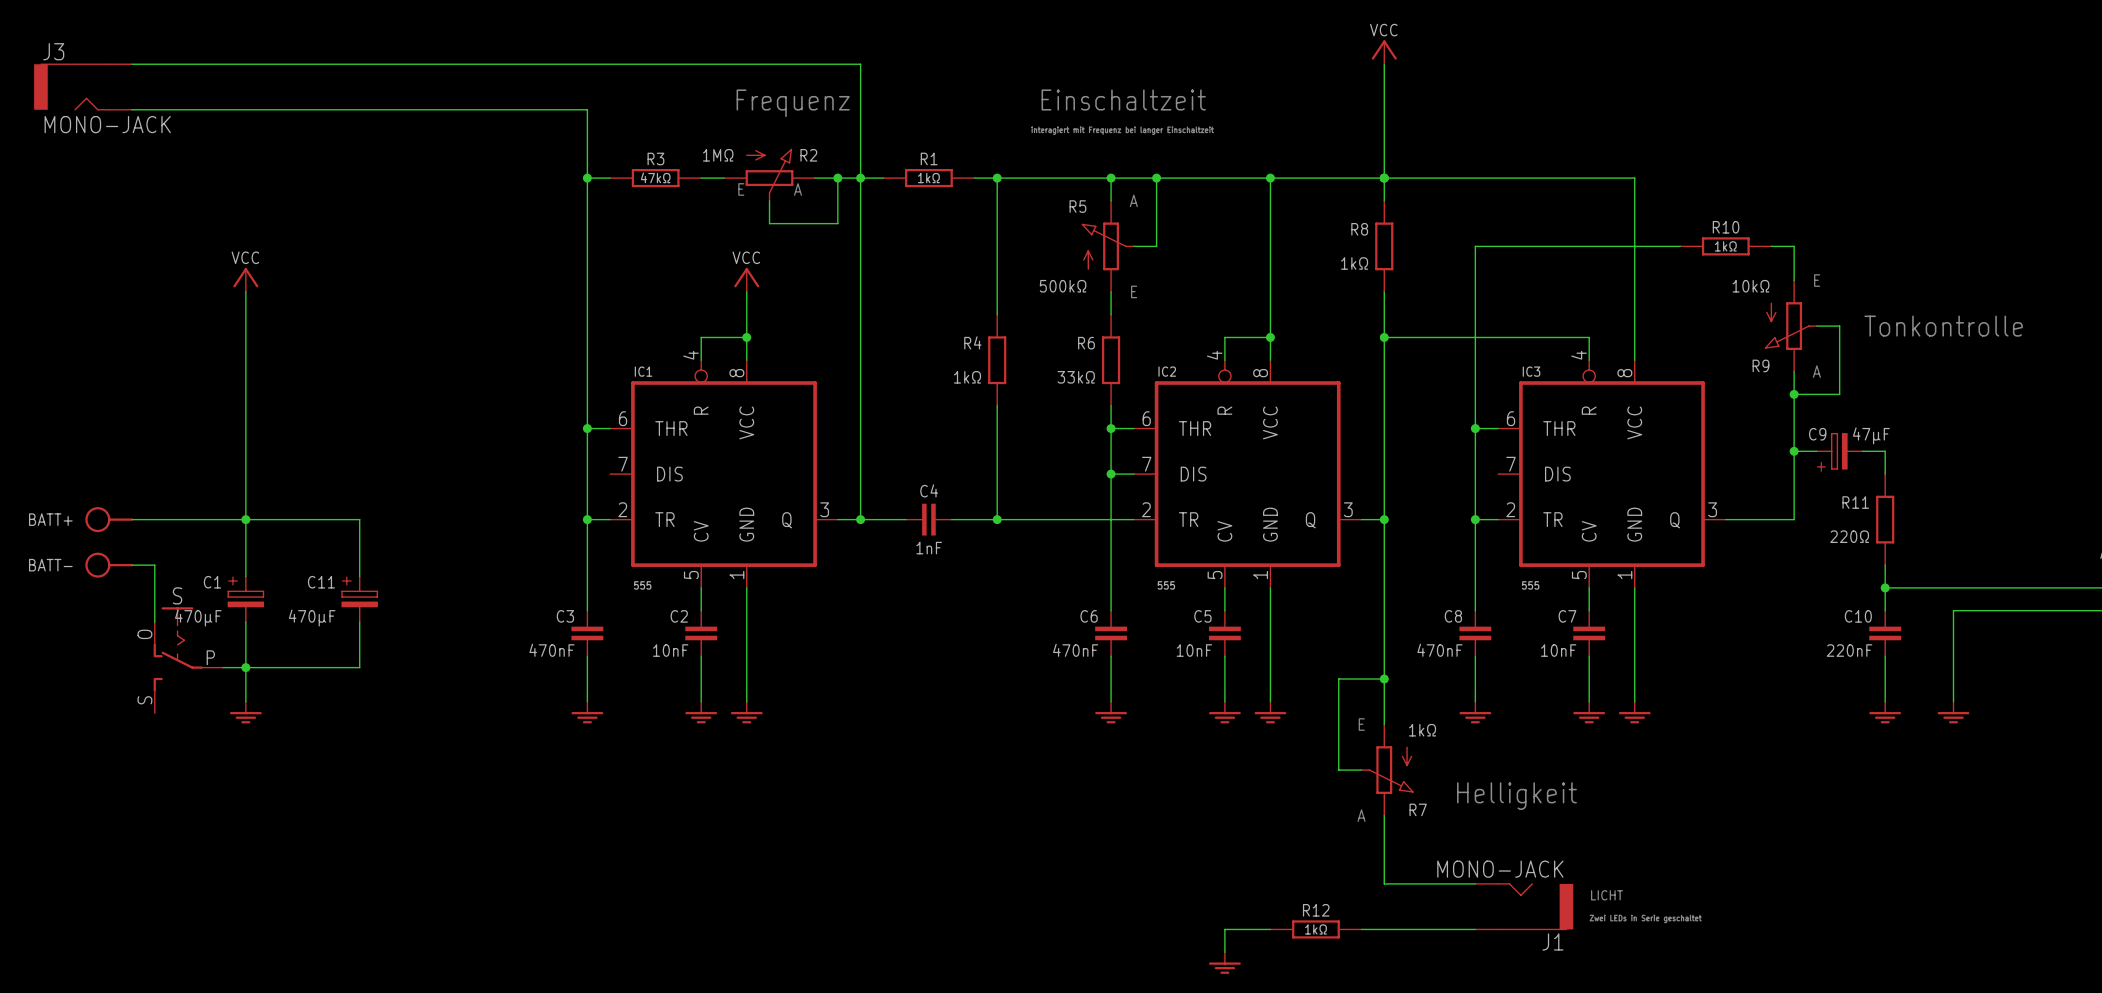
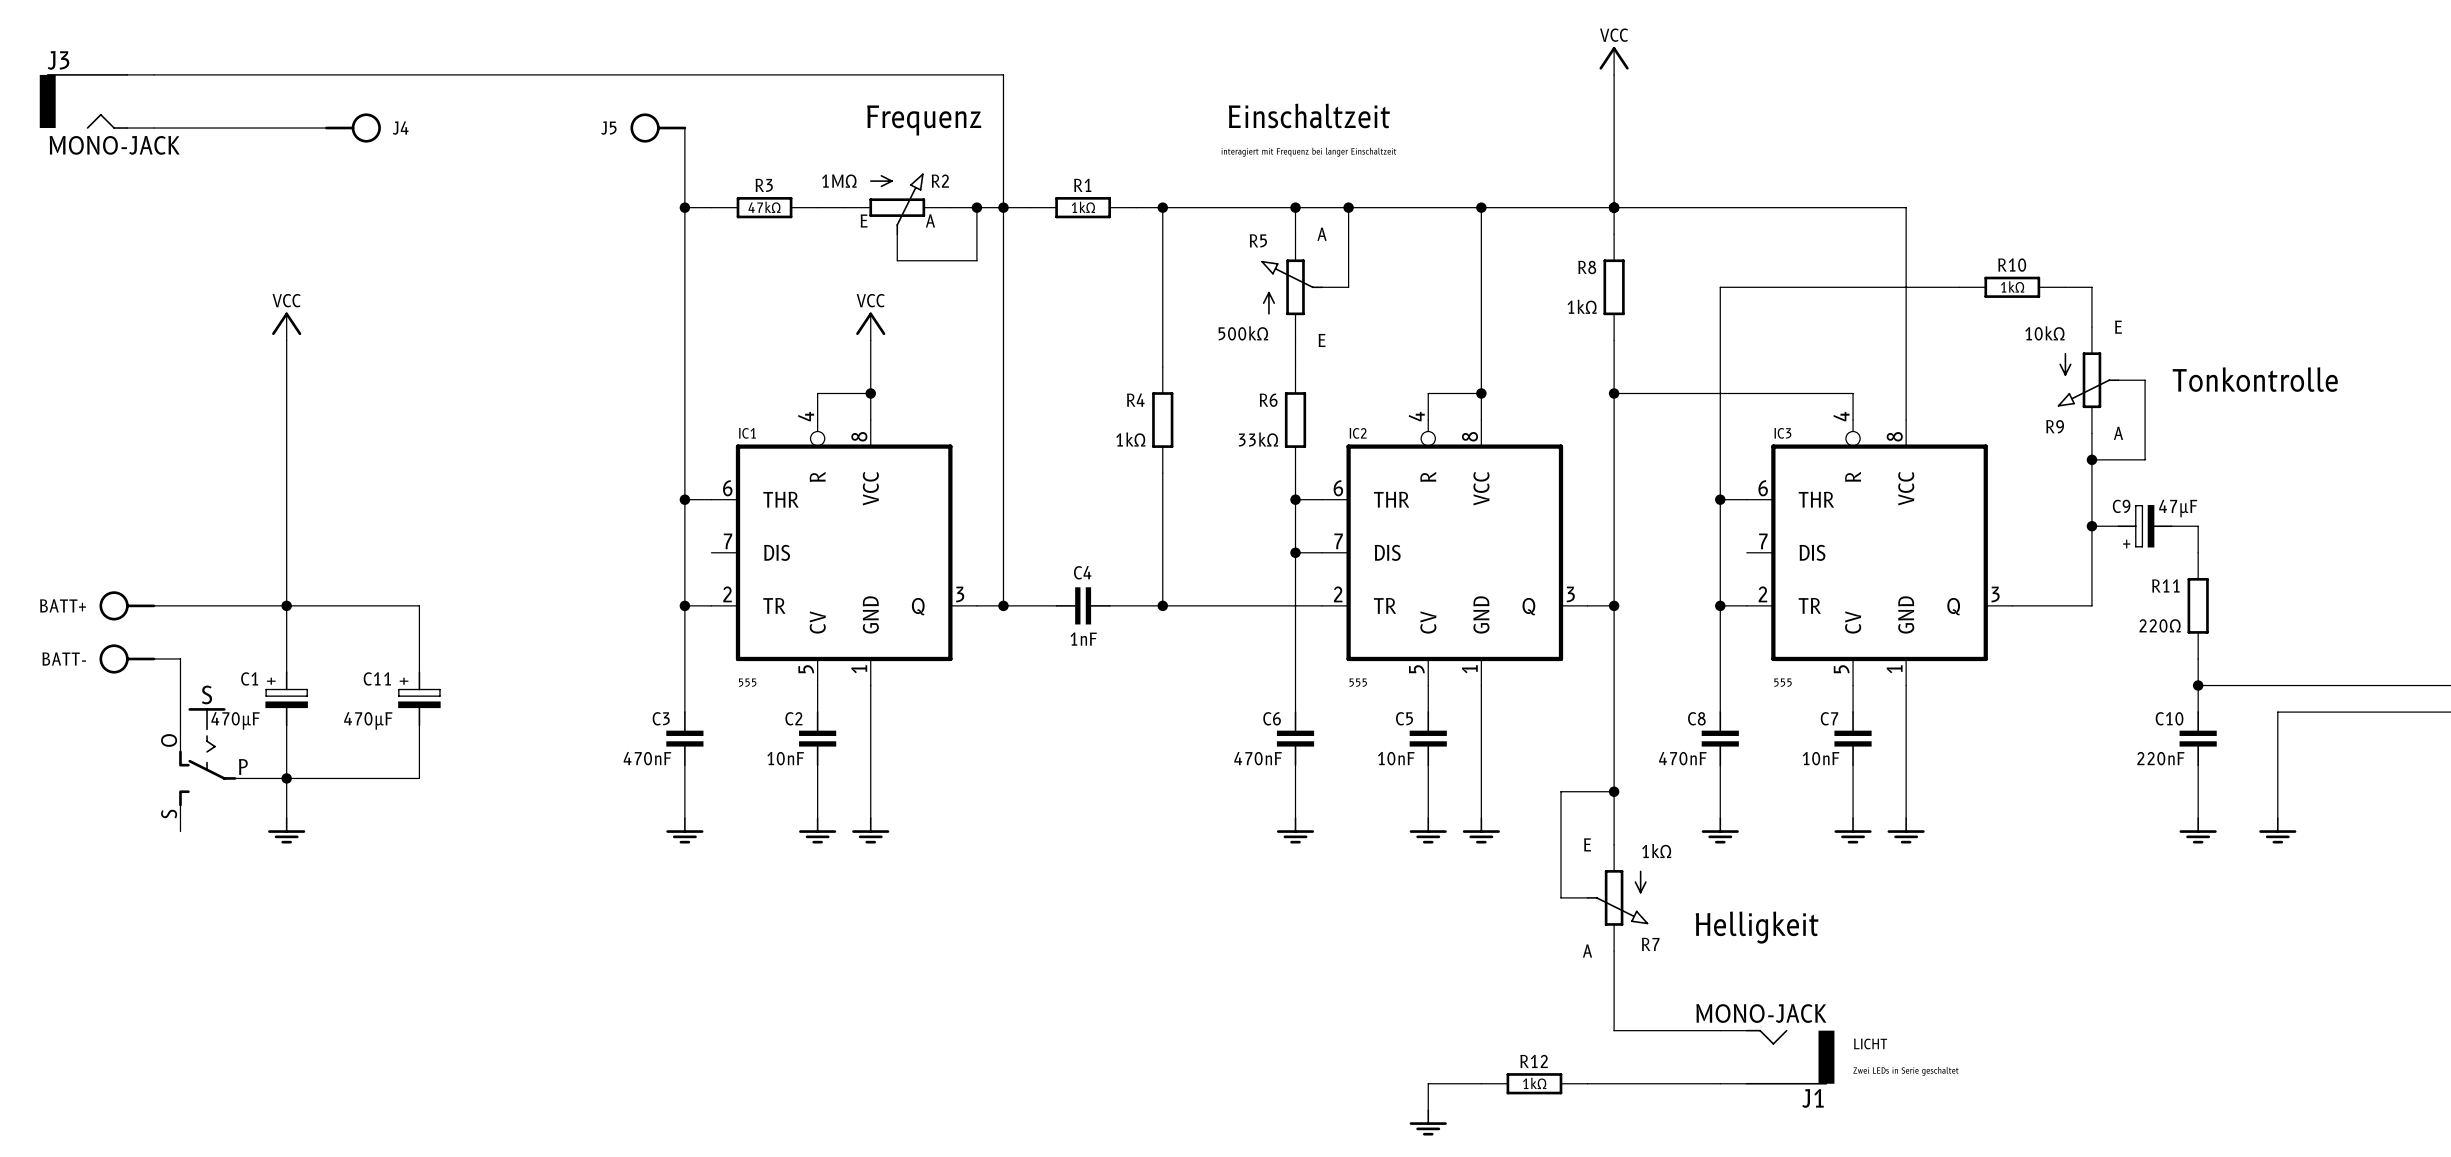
wire: (280, 109) (587, 109) -> none
J4: none -> (353, 128)
J5: none -> (658, 128)

